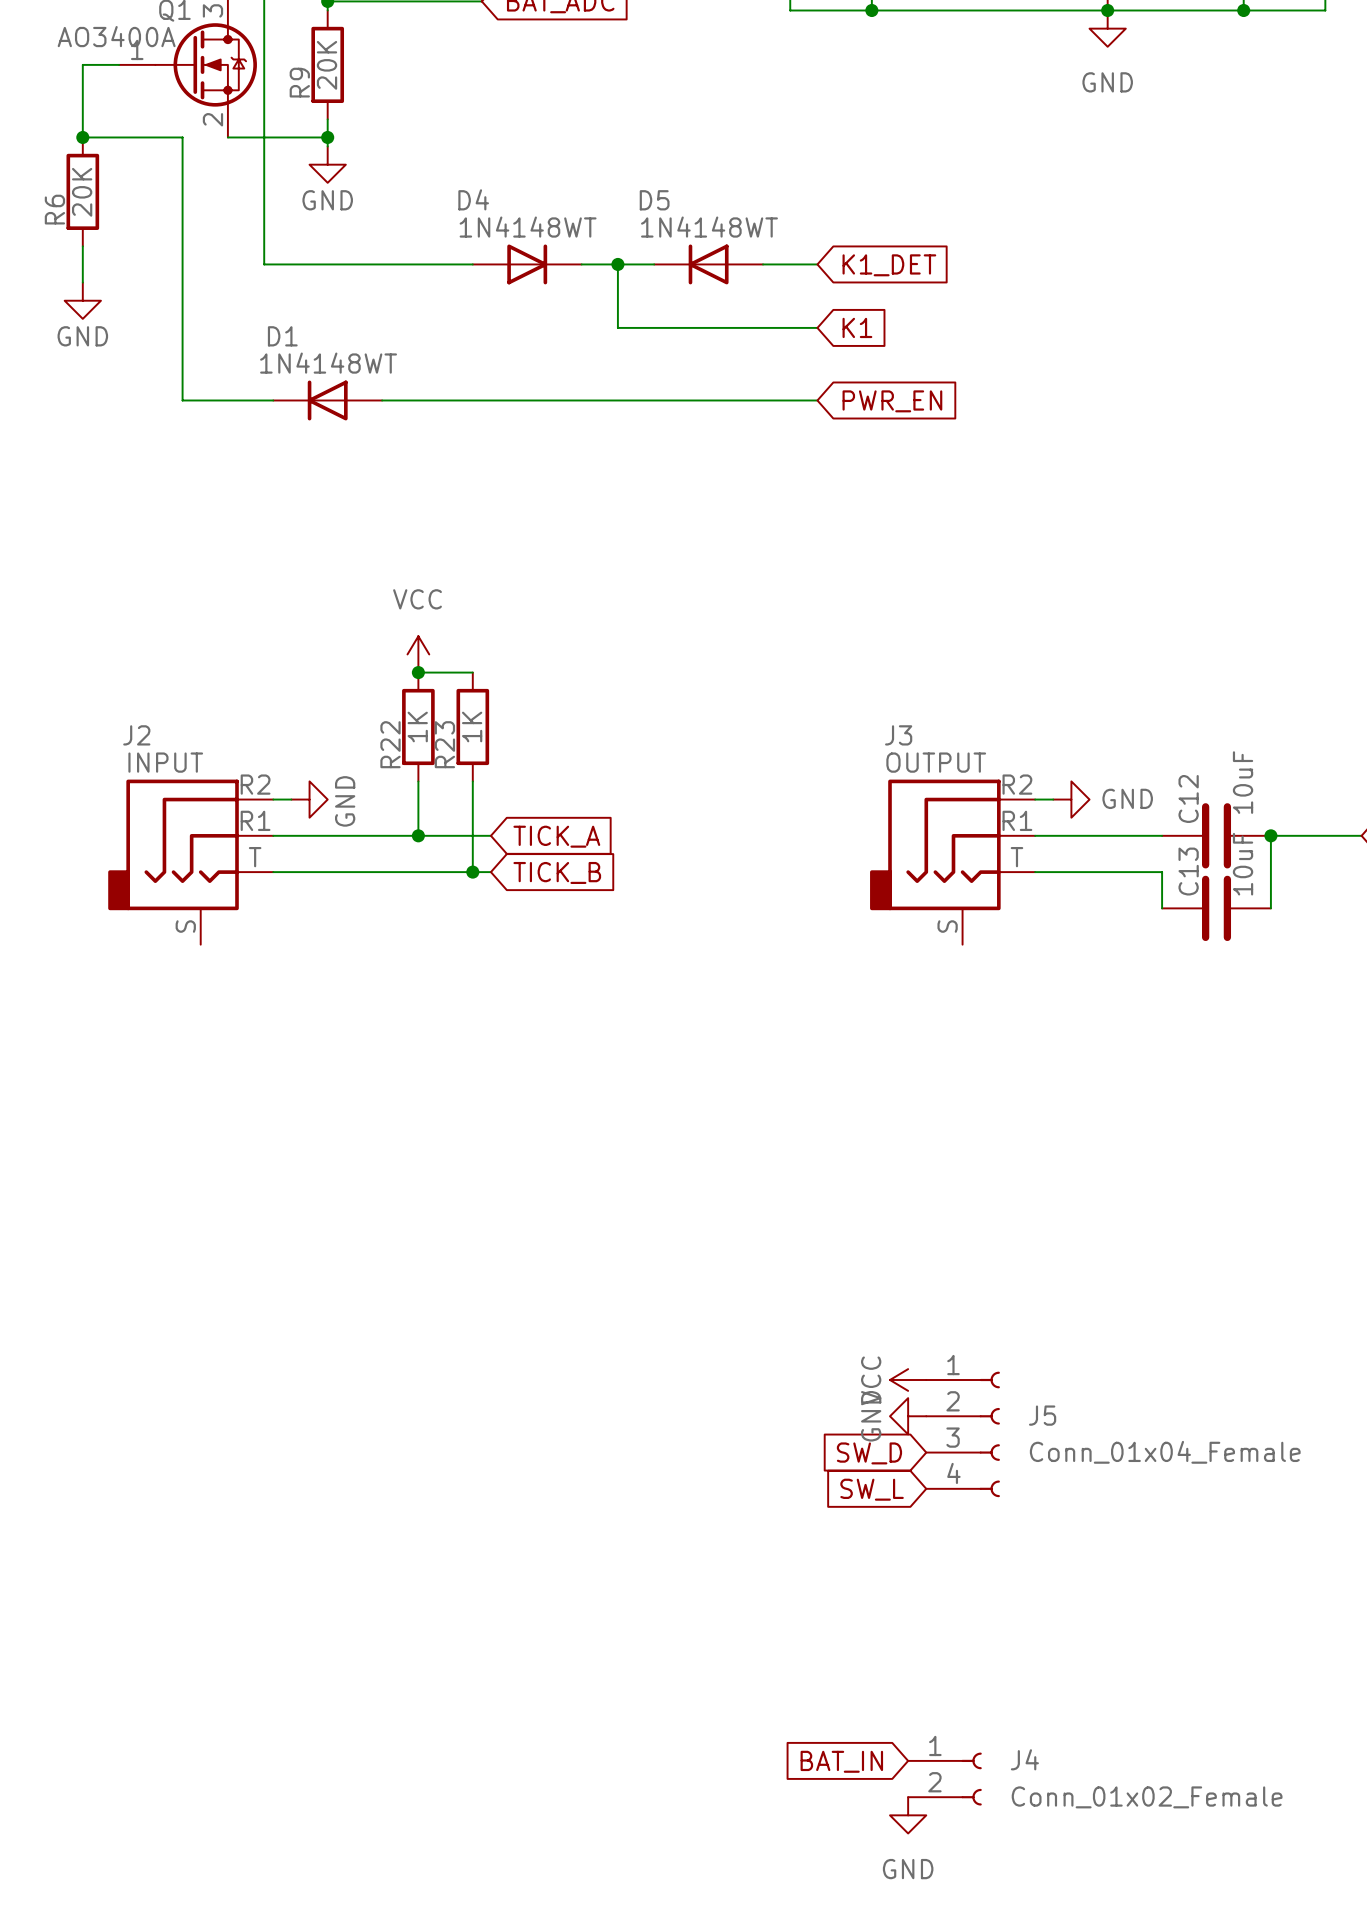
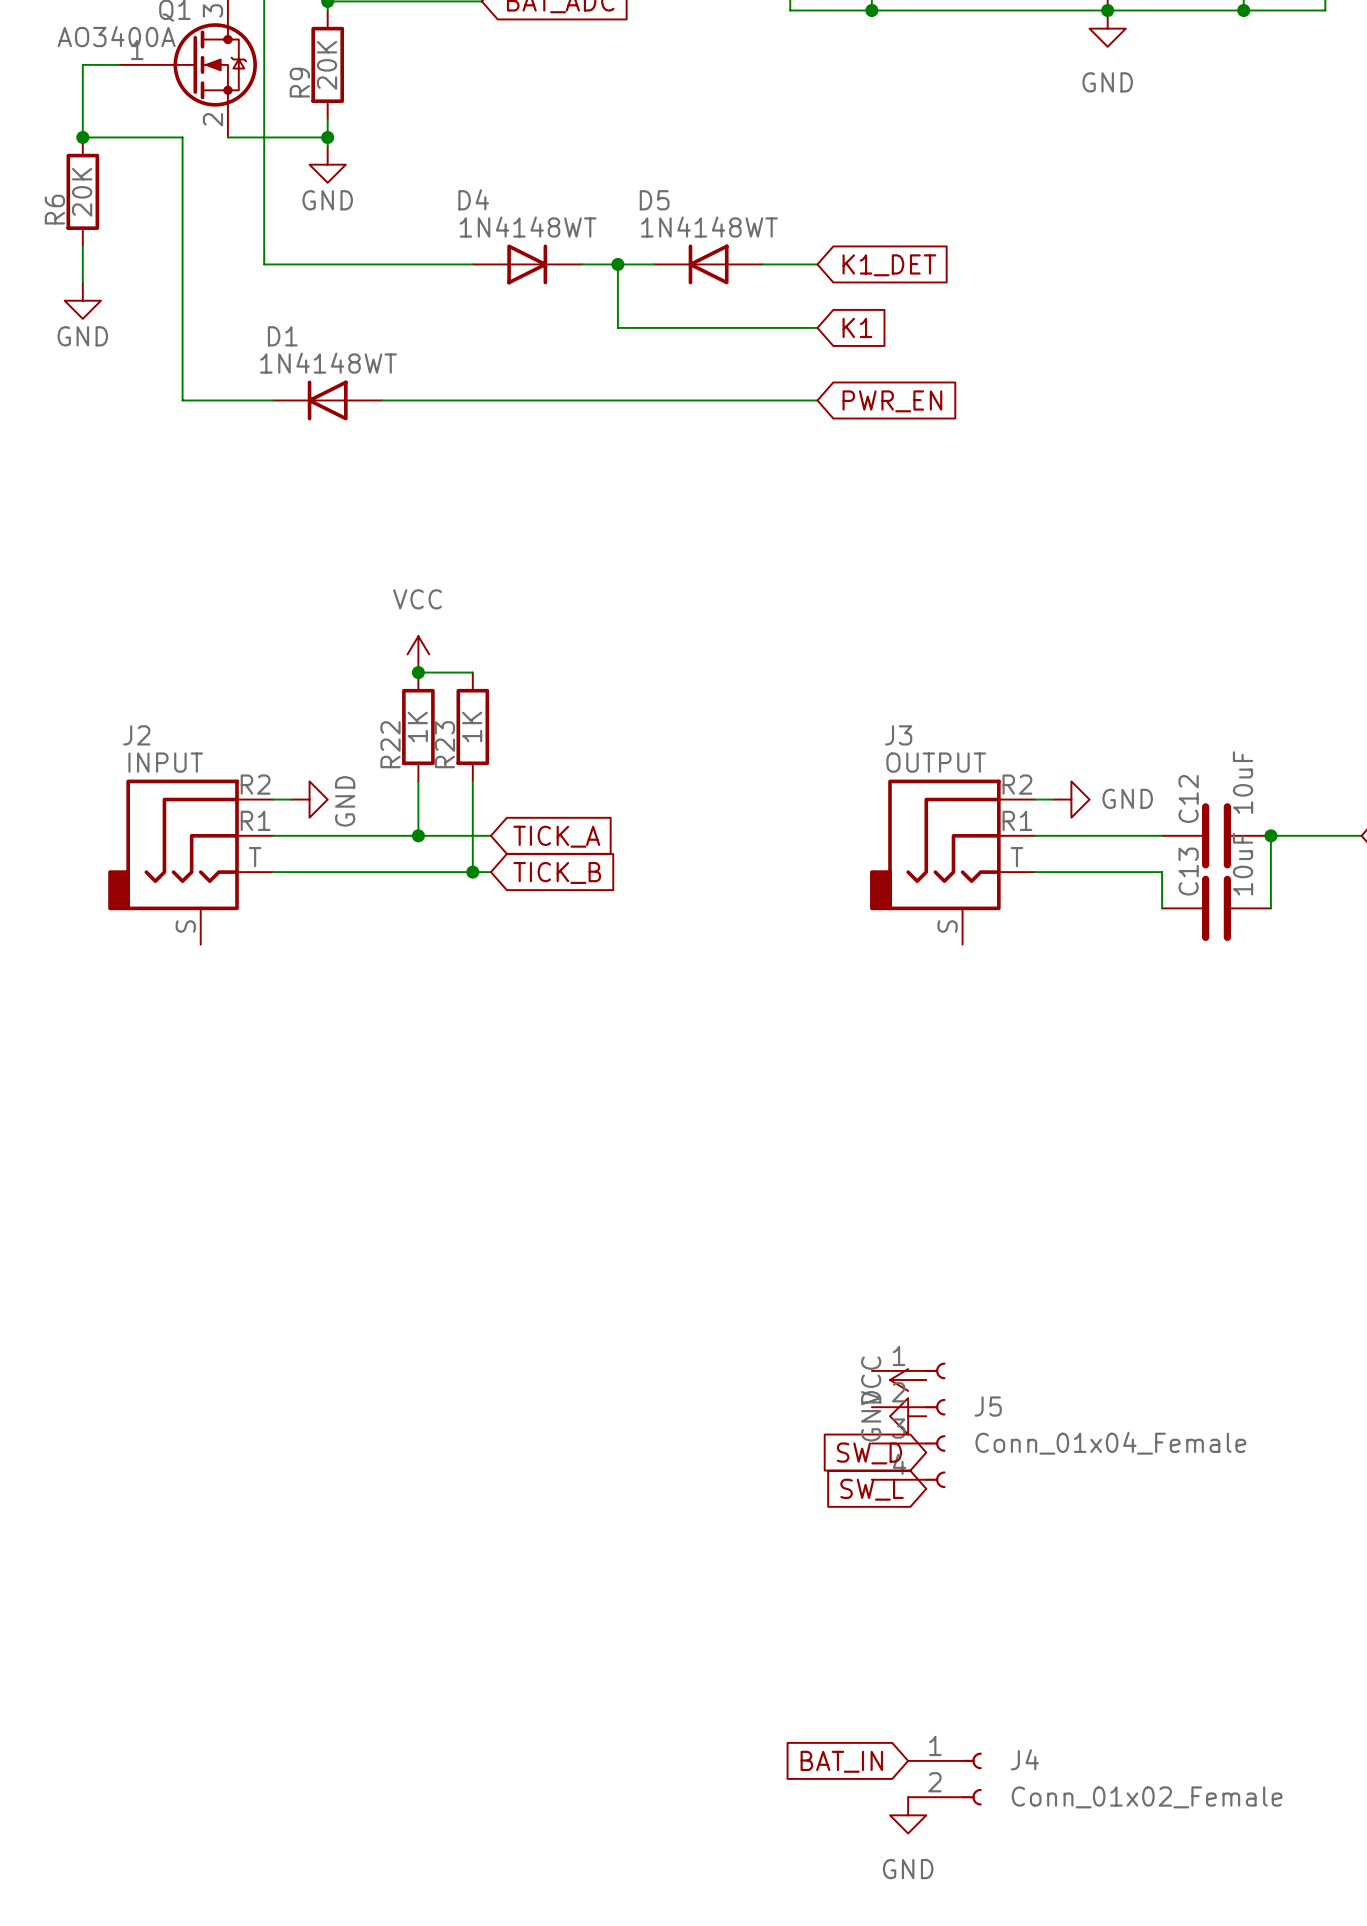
J5 position: (963, 1434) -> (908, 1425)

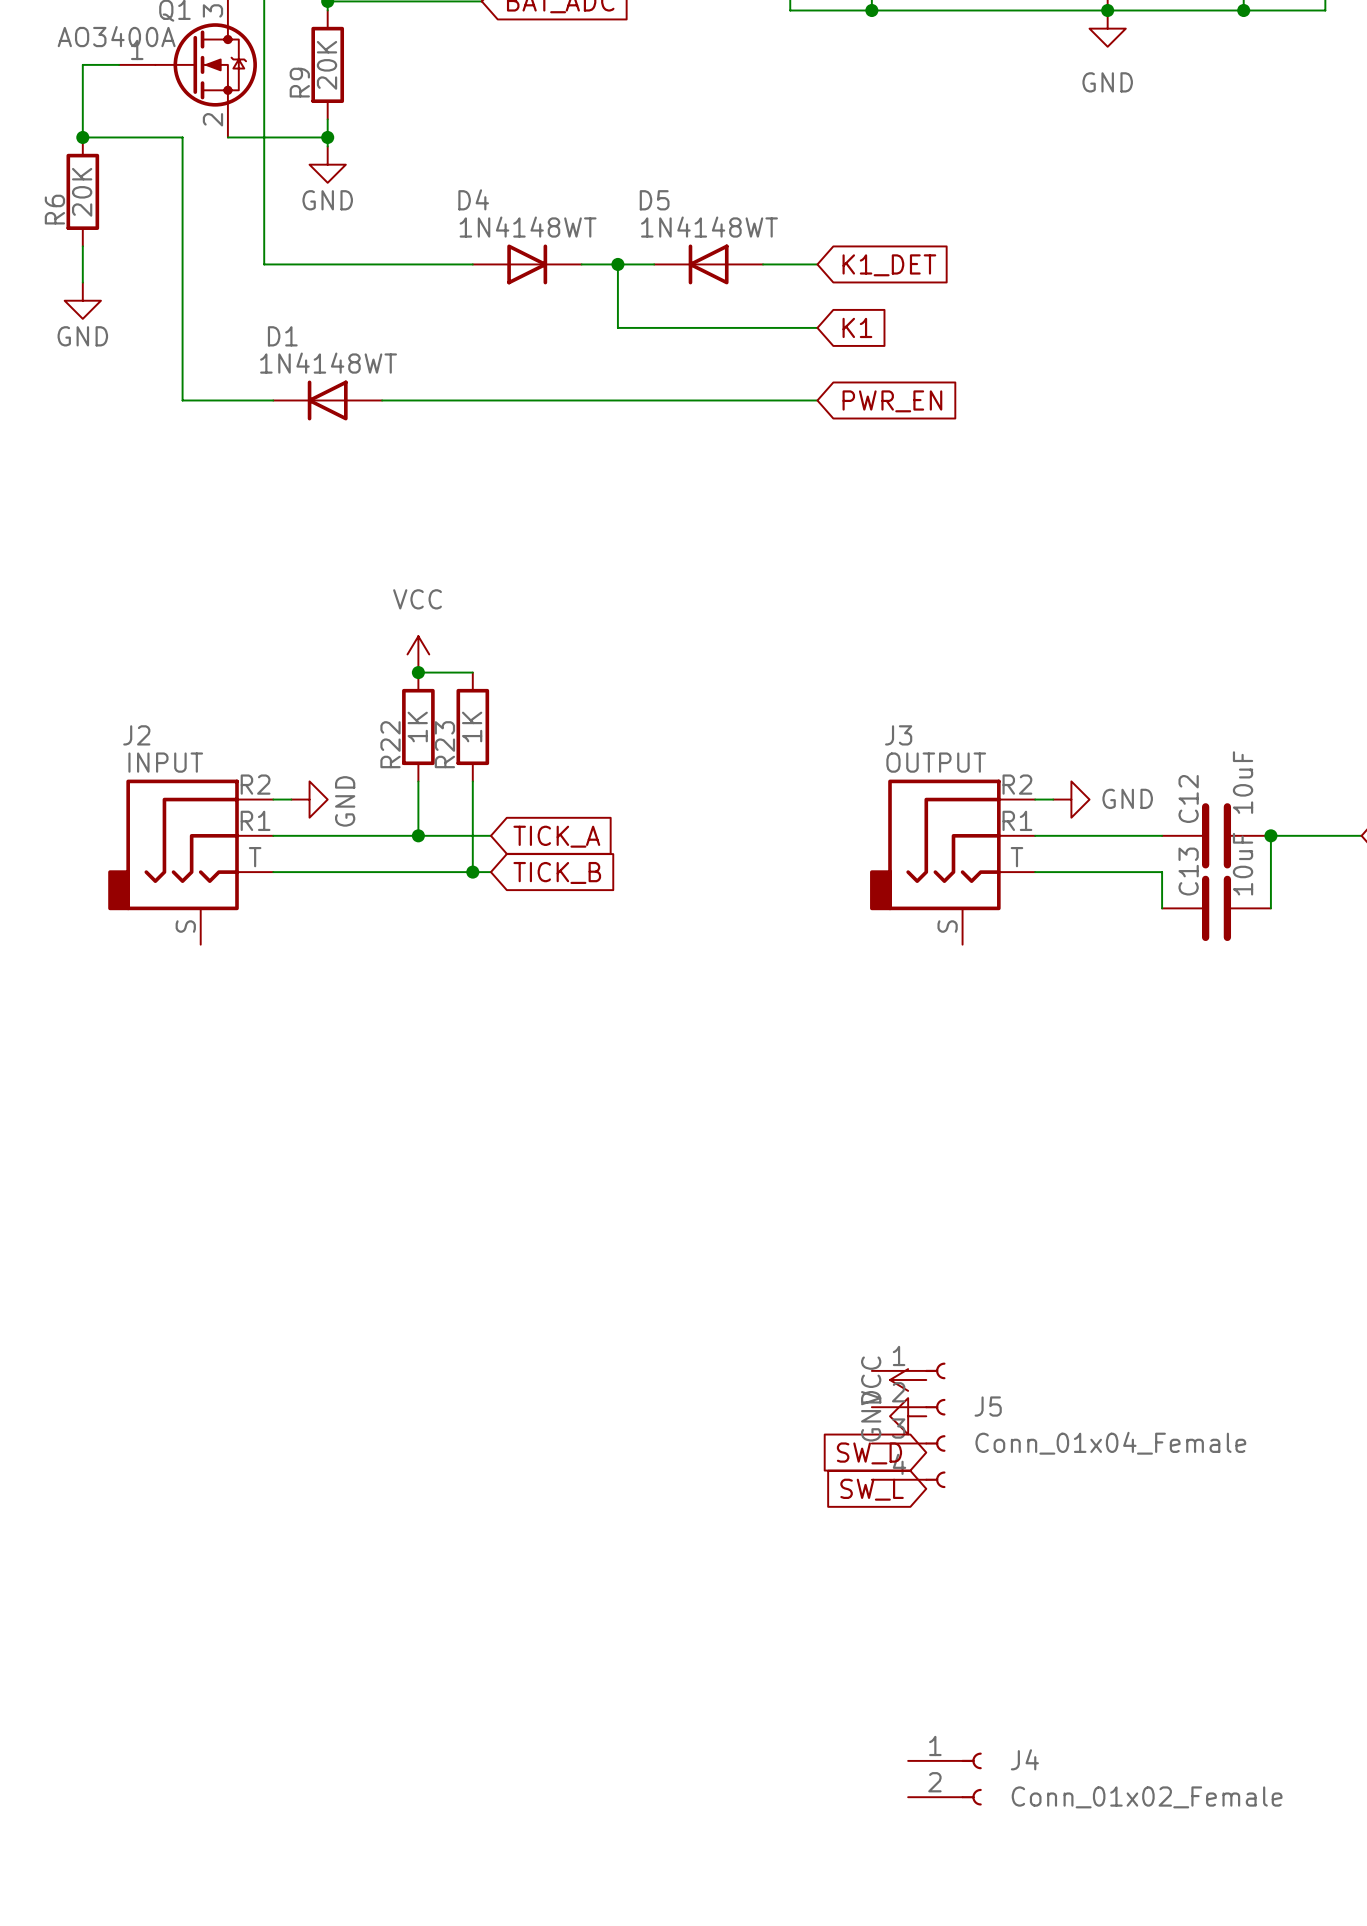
global label: BAT_IN (841, 1761) -> none
power symbol: GND (908, 1815) -> none

